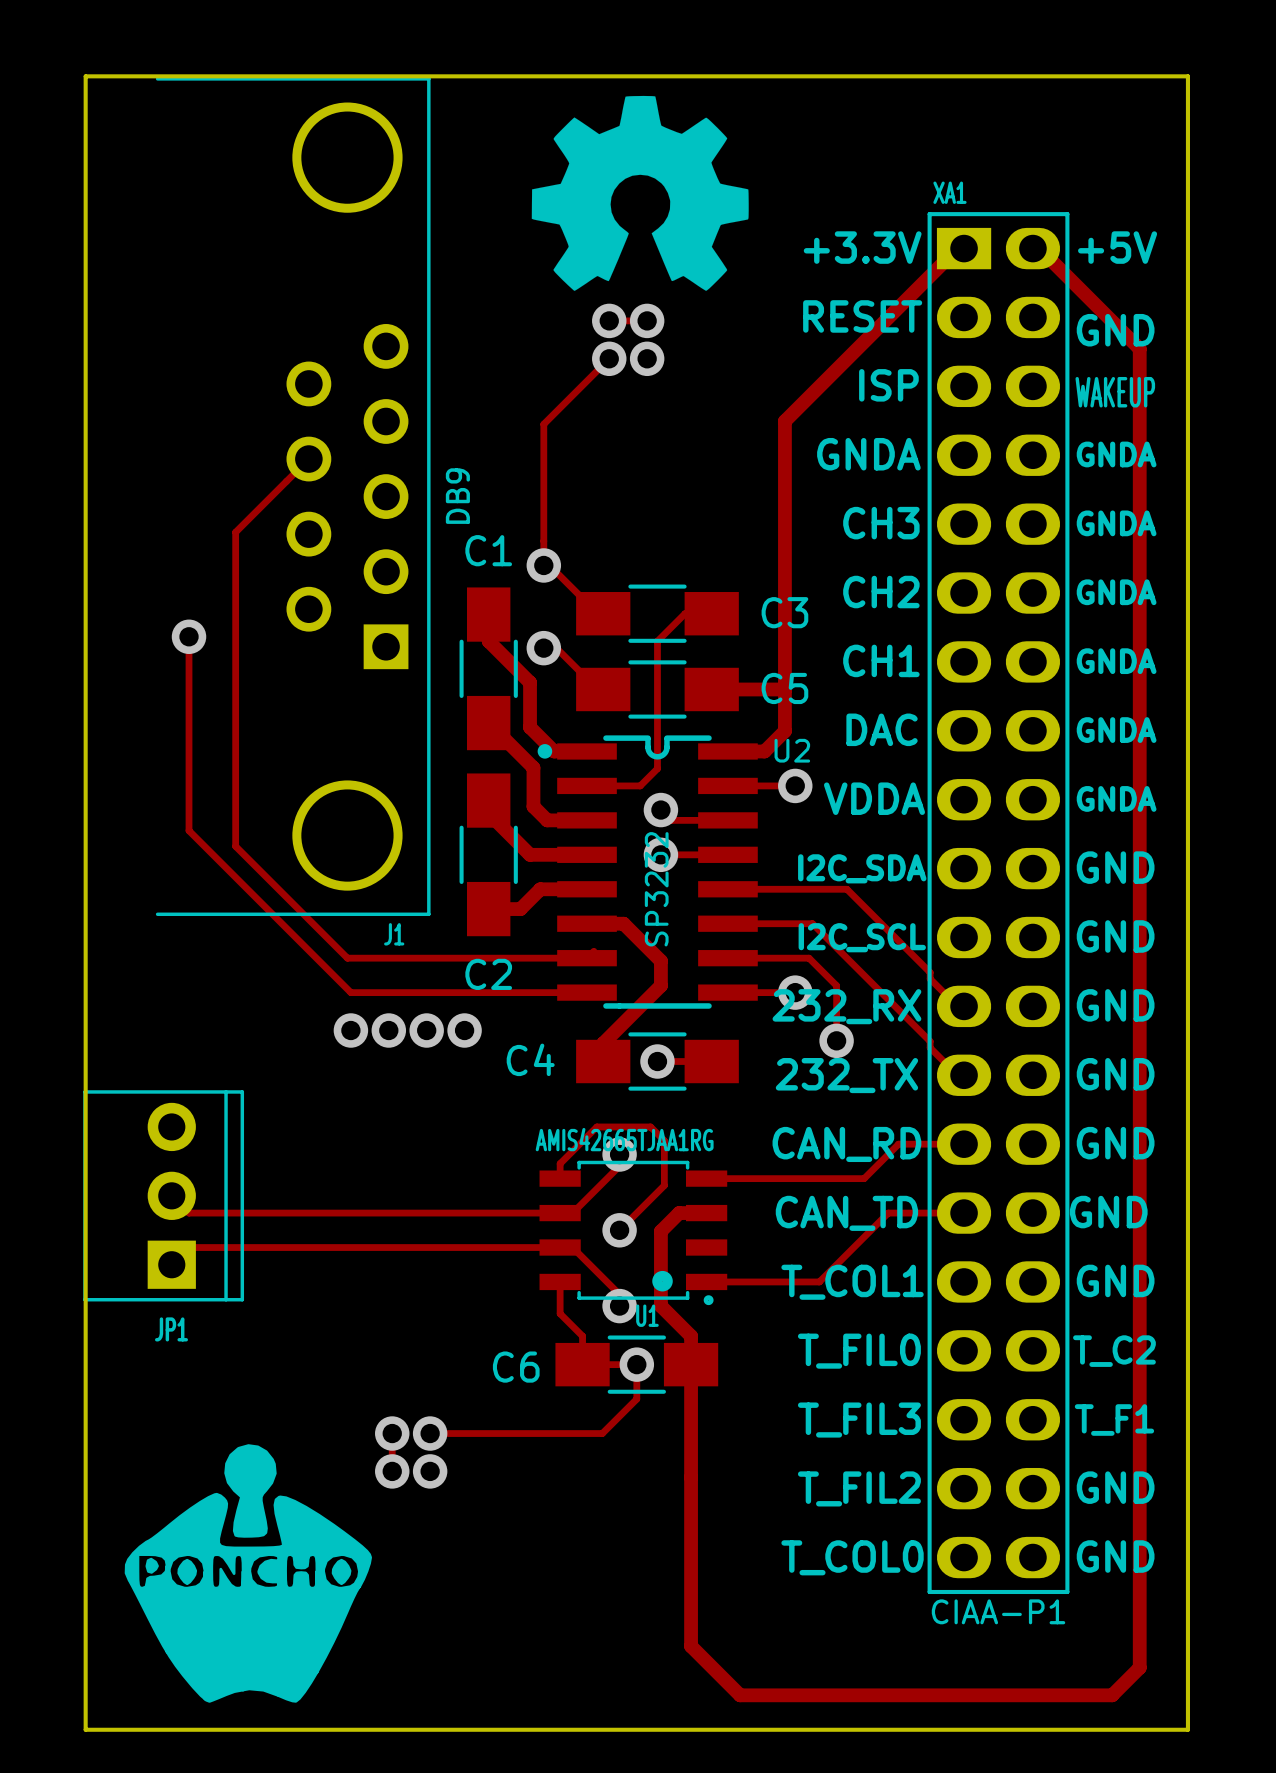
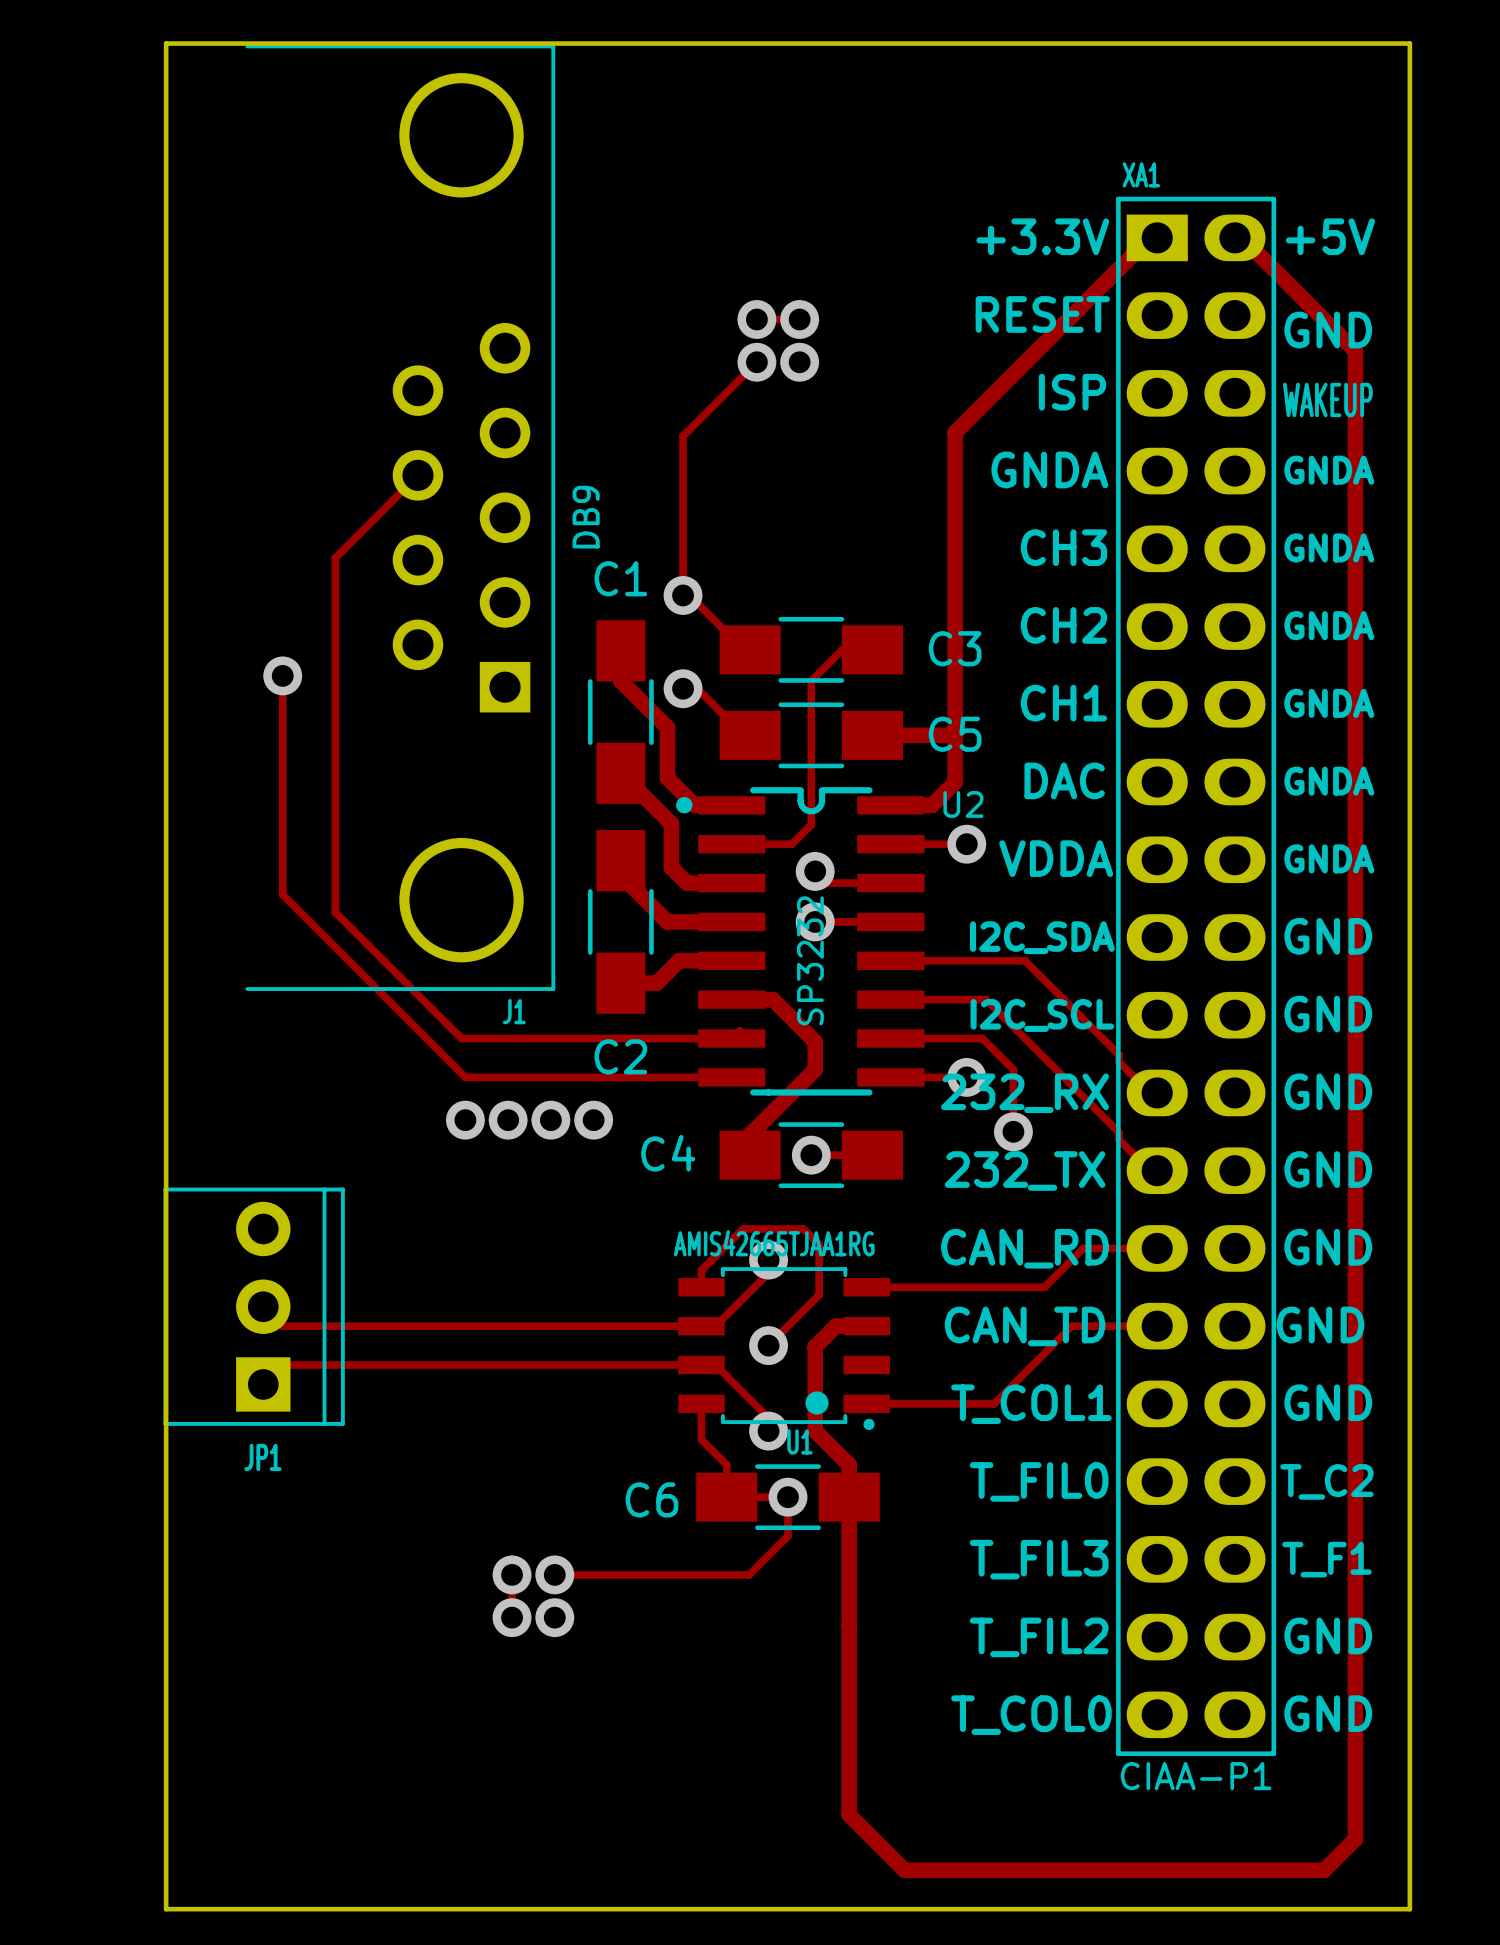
drawing: [531, 95, 749, 291] -> none
drawing: [124, 1444, 372, 1703] -> none

